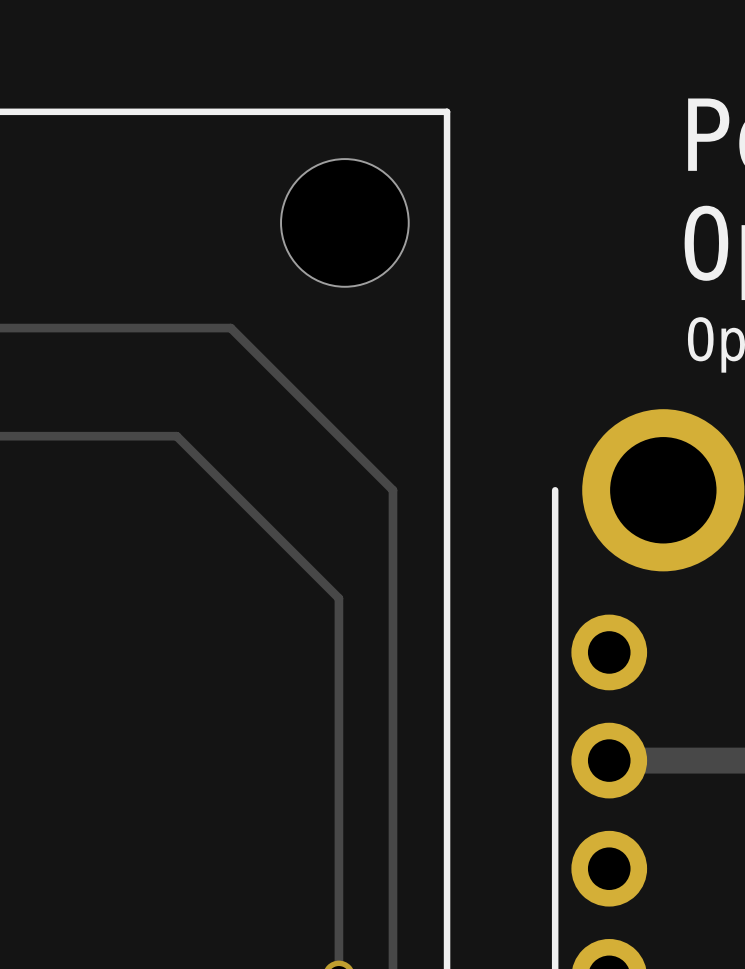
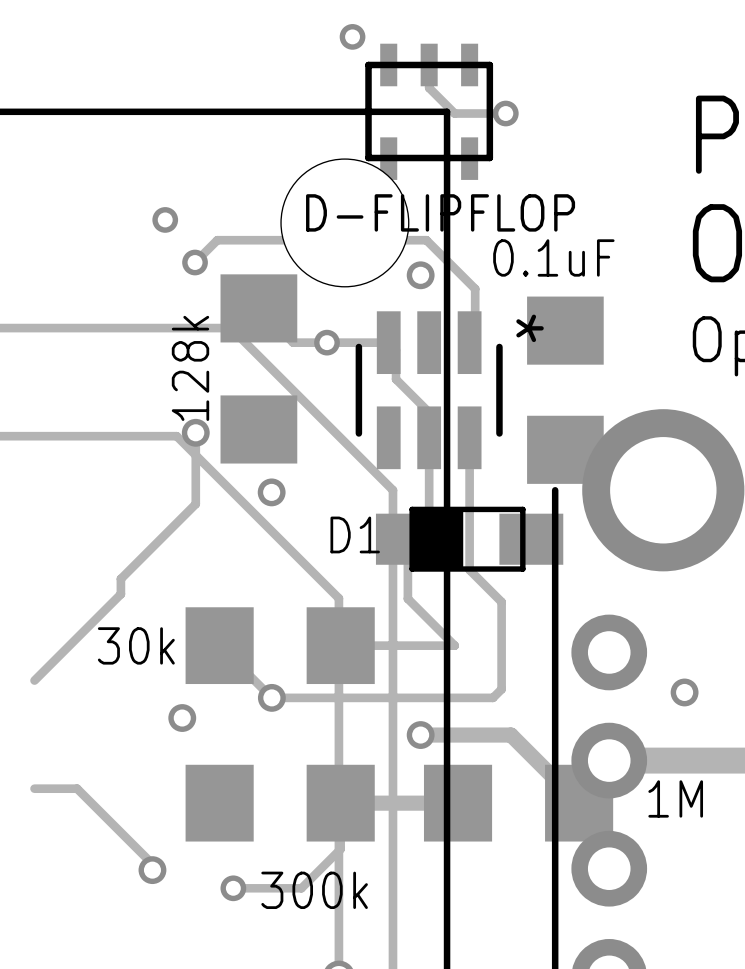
via: none -> (352, 36)
track: none -> (429, 64) (429, 87) (454, 113) (505, 113)
part: none -> (429, 111)
via: none -> (505, 113)
via: none -> (165, 219)
track: none -> (195, 262) (217, 240) (426, 240) (475, 288) (475, 337)
via: none -> (195, 262)
via: none -> (420, 275)
track: none -> (258, 308) (293, 342) (388, 342) (395, 349) (395, 379) (429, 412) (429, 517) (407, 539) (407, 598) (454, 645) (340, 645)
via: none -> (327, 342)
part: none -> 128k (258, 368)
D-FLIPFLOP: none -> (429, 390)
part: none -> 0.1uF (565, 390)
track: none -> (195, 432) (195, 504) (120, 578) (120, 594) (34, 680)
via: none -> (195, 432)
track: none -> (469, 437) (469, 570) (501, 602) (501, 689) (493, 697) (271, 697) (219, 645)
via: none -> (271, 492)
D1: none -> (469, 539)
part: none -> 30k (280, 645)
via: none -> (684, 692)
via: none -> (271, 697)
via: none -> (182, 718)
track: none -> (420, 735) (510, 735) (579, 803)
via: none -> (420, 735)
track: none -> (34, 788) (77, 788) (152, 864) (152, 870)
part: none -> 300k (280, 803)
track: none -> (458, 803) (340, 803) (340, 849) (301, 888) (233, 888)
part: none -> 1M (518, 803)
via: none -> (152, 870)
via: none -> (233, 888)

